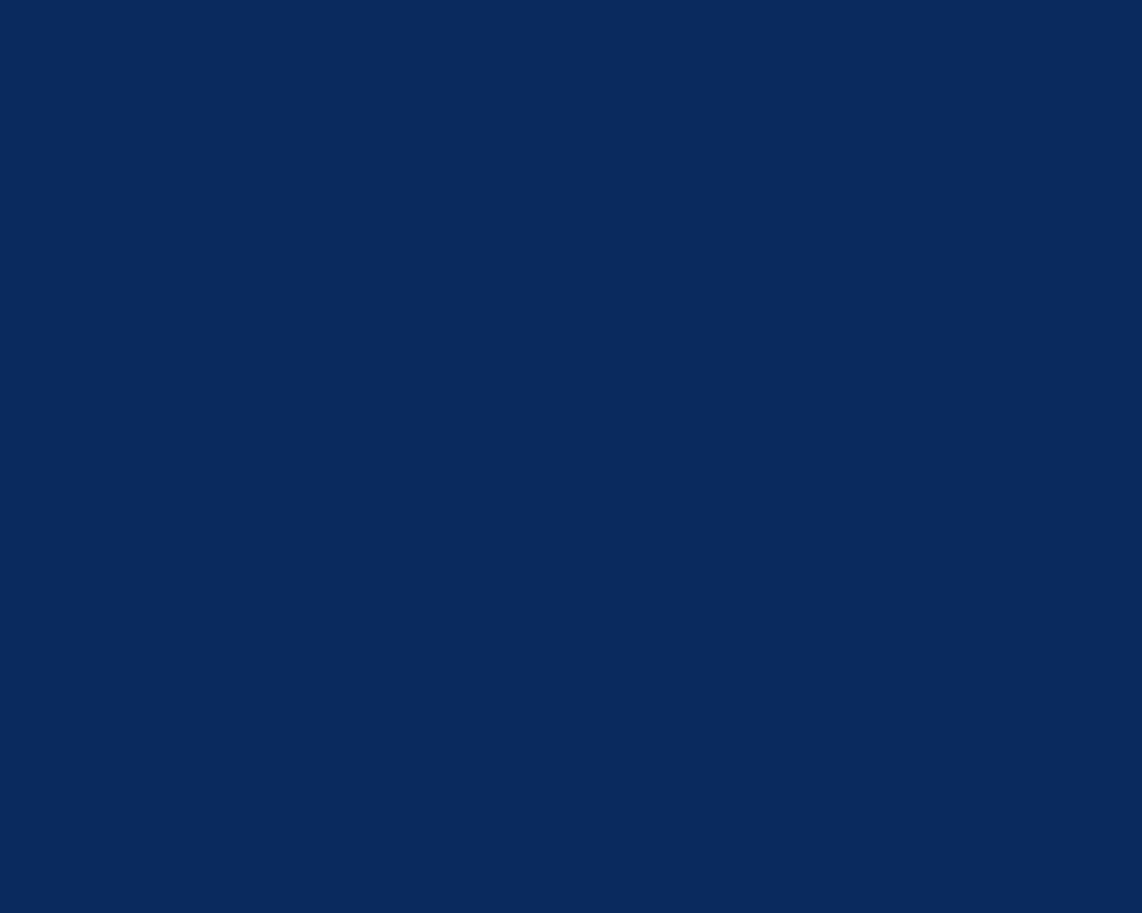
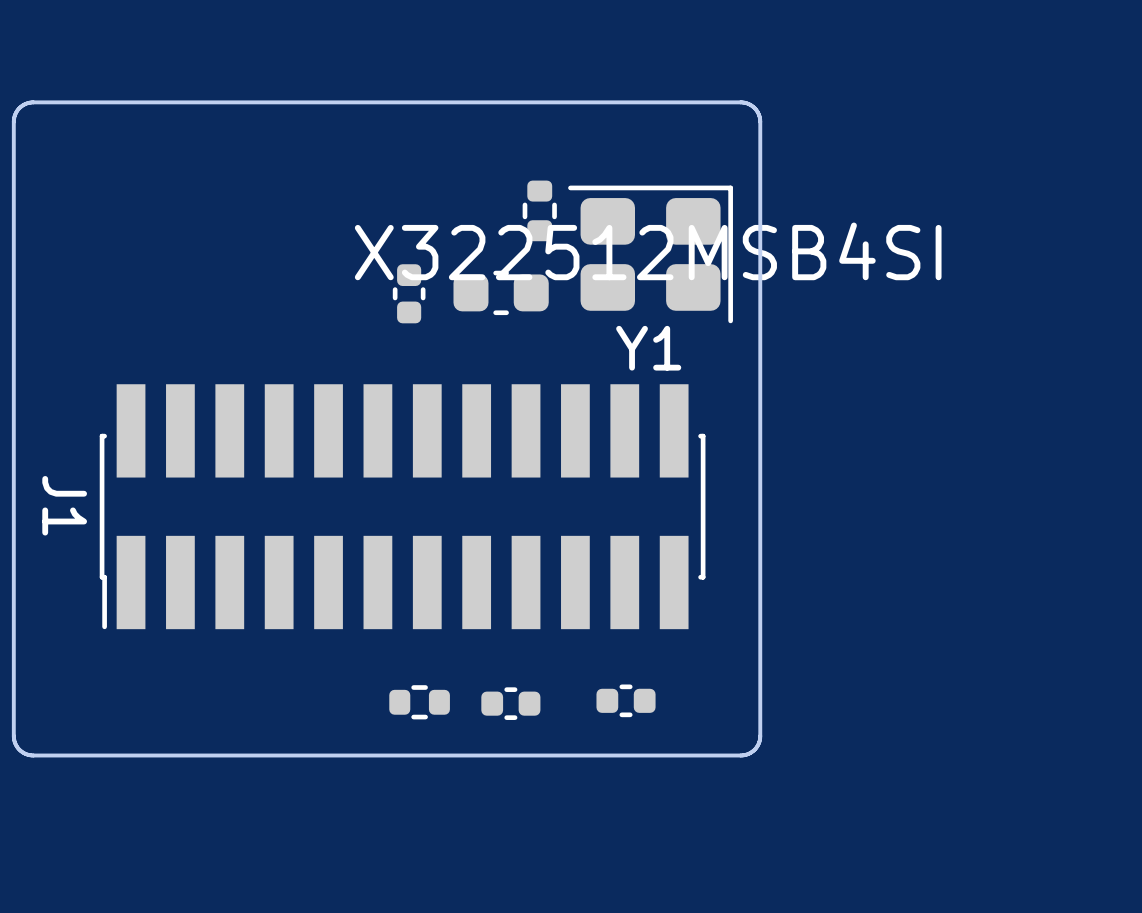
board edge: none -> (742, 102) (755, 109) (760, 121) (760, 736) (757, 745) (753, 751) (740, 755) (33, 755) (24, 753) (18, 748) (13, 736) (13, 121) (16, 112) (20, 106) (33, 102) (742, 102)
part: none -> (539, 210)
Y1: none -> (650, 254)
part: none -> (501, 292)
part: none -> (409, 293)
J1: none -> (402, 506)
part: none -> (626, 700)
part: none -> (419, 702)
part: none -> (510, 703)

